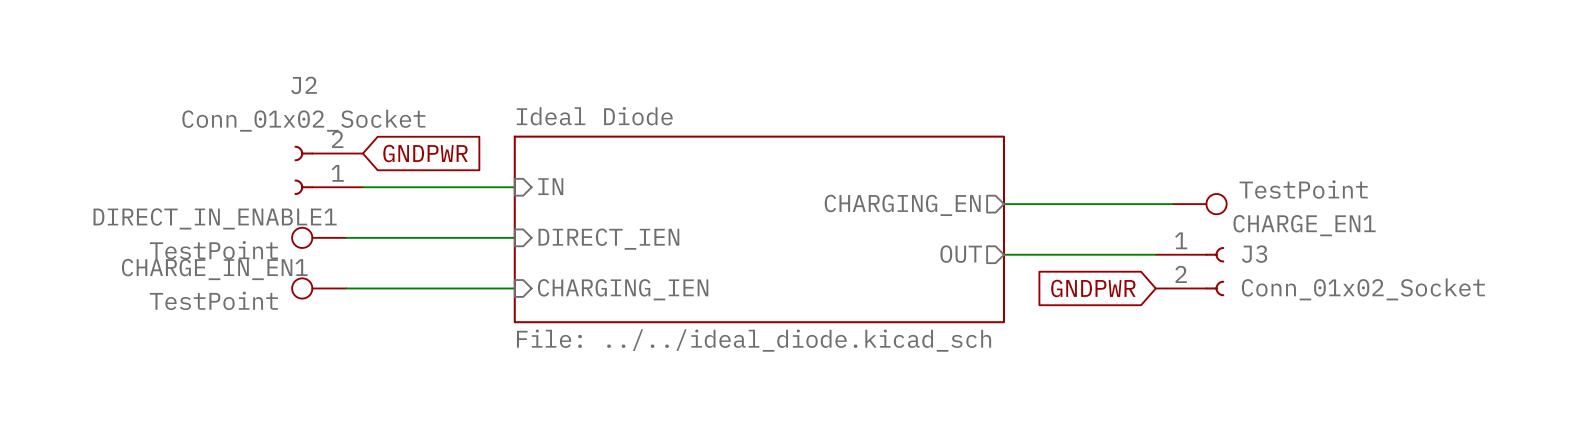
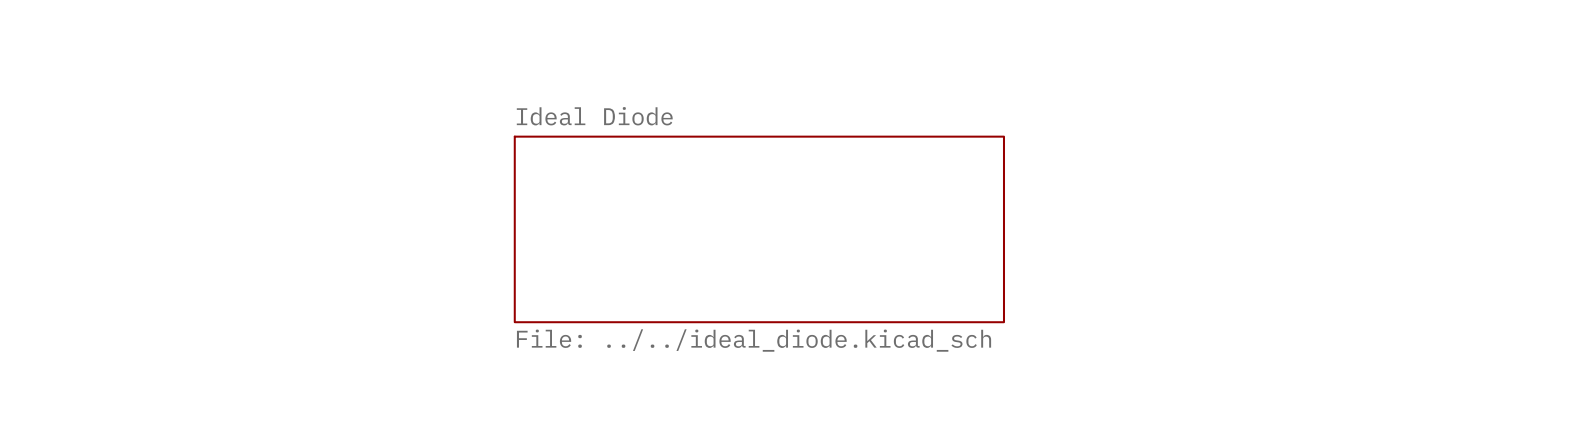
global label: GNDPWR (425, 153) -> none
J2: Conn_01x02_Socket (328, 170) -> none
sheet pin: IN (550, 186) -> none
wire: (362, 187) (514, 187) -> none
wire: (1003, 204) (1172, 204) -> none
CHARGE_EN1: TestPoint (1199, 204) -> none
sheet pin: CHARGING_EN (902, 205) -> none
DIRECT_IN_ENABLE1: TestPoint (319, 237) -> none
wire: (346, 237) (514, 237) -> none
sheet pin: DIRECT_IEN (608, 239) -> none
sheet pin: OUT (961, 254) -> none
wire: (1003, 254) (1155, 254) -> none
J3: Conn_01x02_Socket (1190, 271) -> none
CHARGE_IN_EN1: TestPoint (319, 288) -> none
wire: (346, 288) (514, 288) -> none
global label: GNDPWR (1093, 288) -> none
sheet pin: CHARGING_IEN (623, 289) -> none

